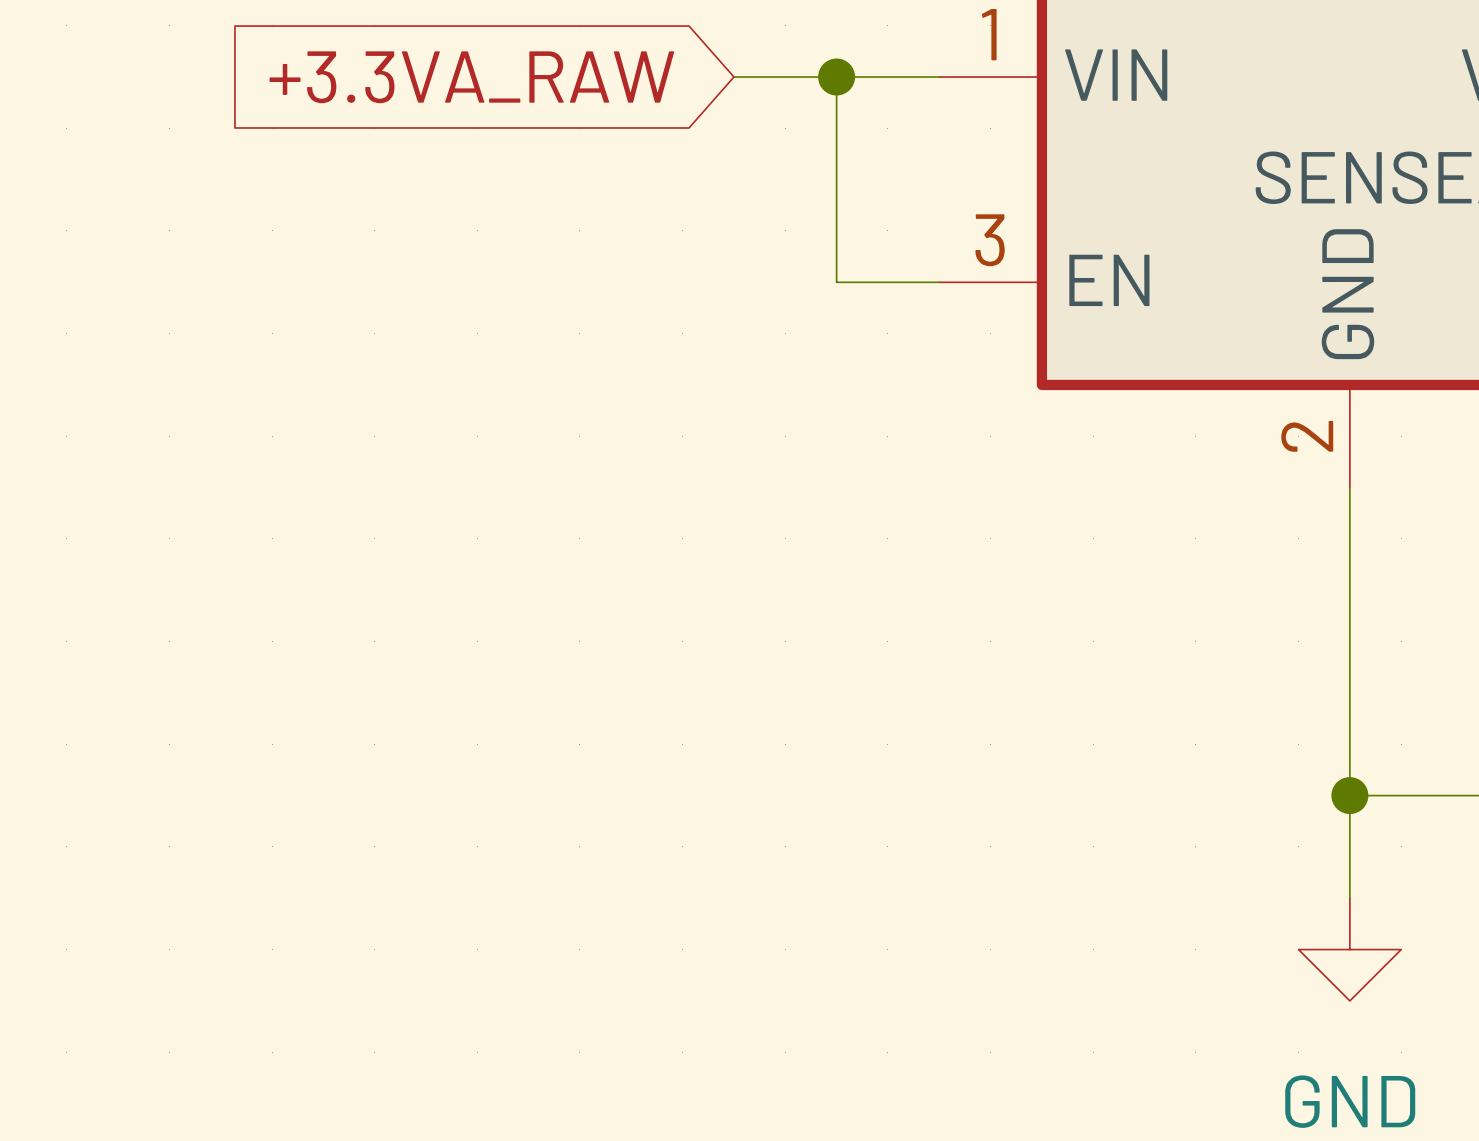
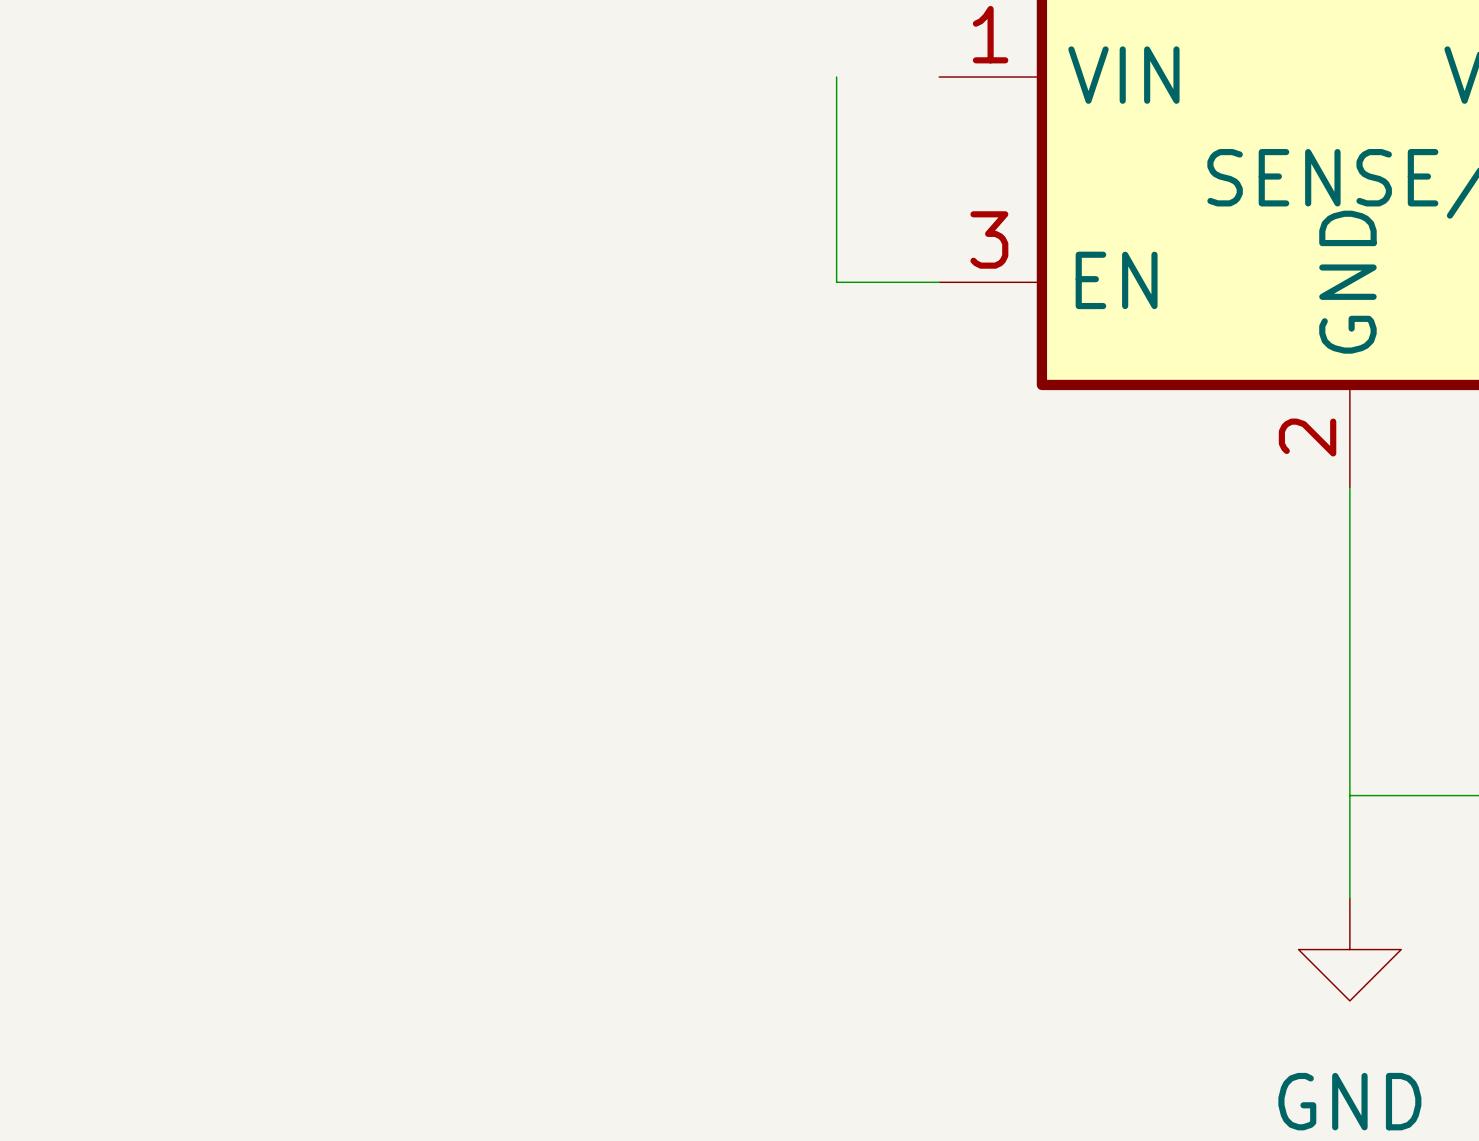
global label: +3.3VA_RAW (471, 77) -> none
wire: (733, 77) (939, 77) -> none
junction: (836, 77) -> none
junction: (1349, 795) -> none

